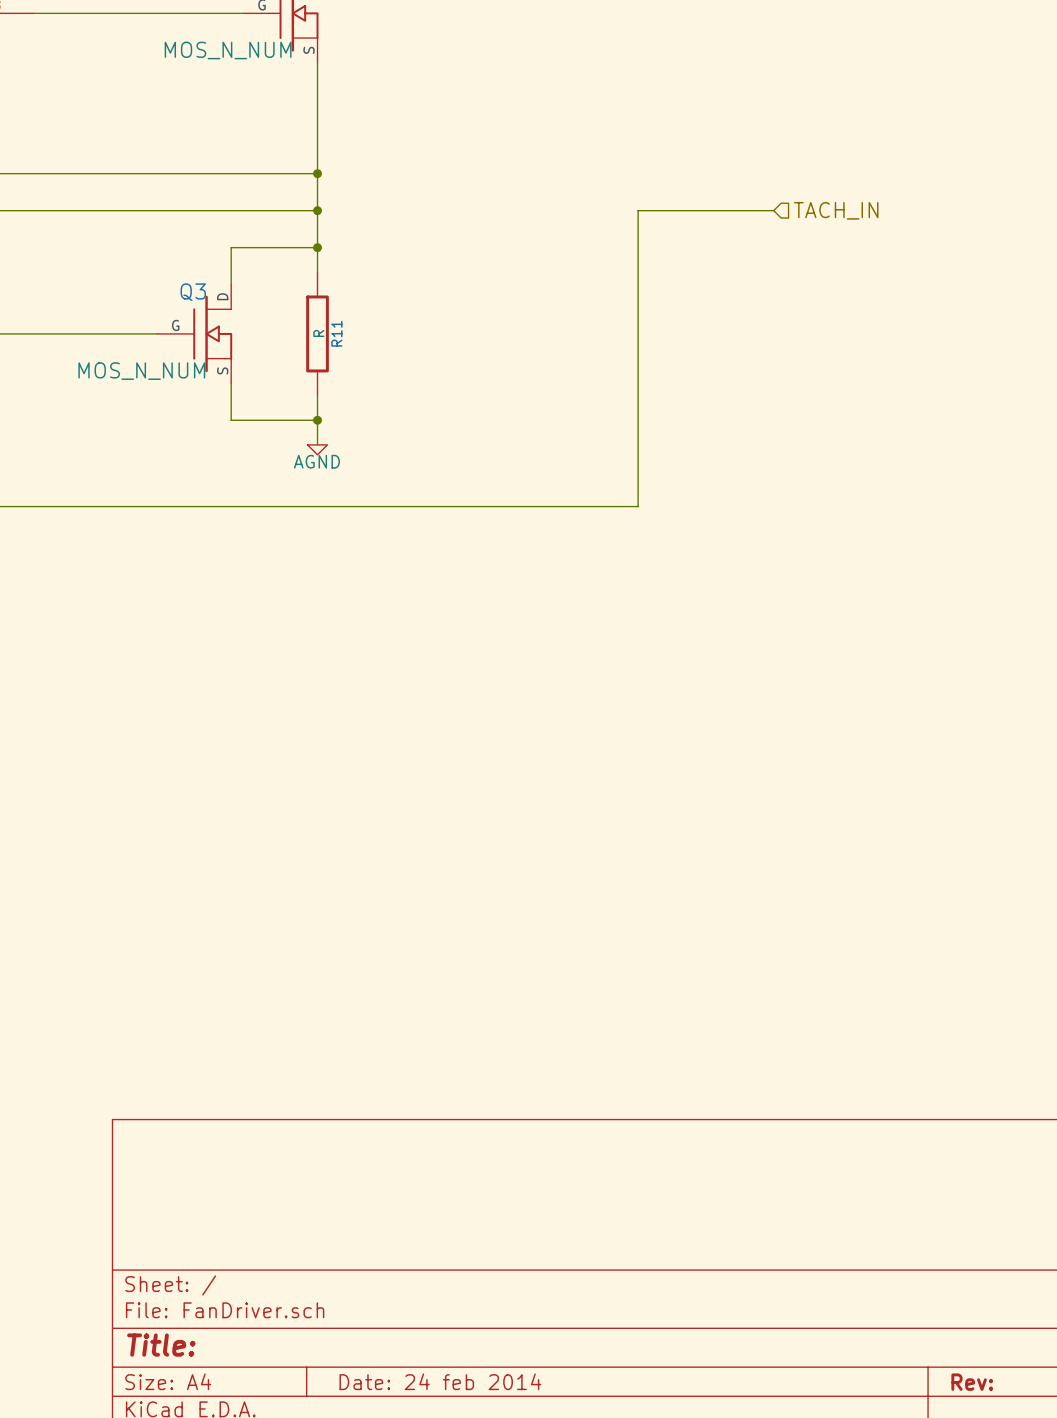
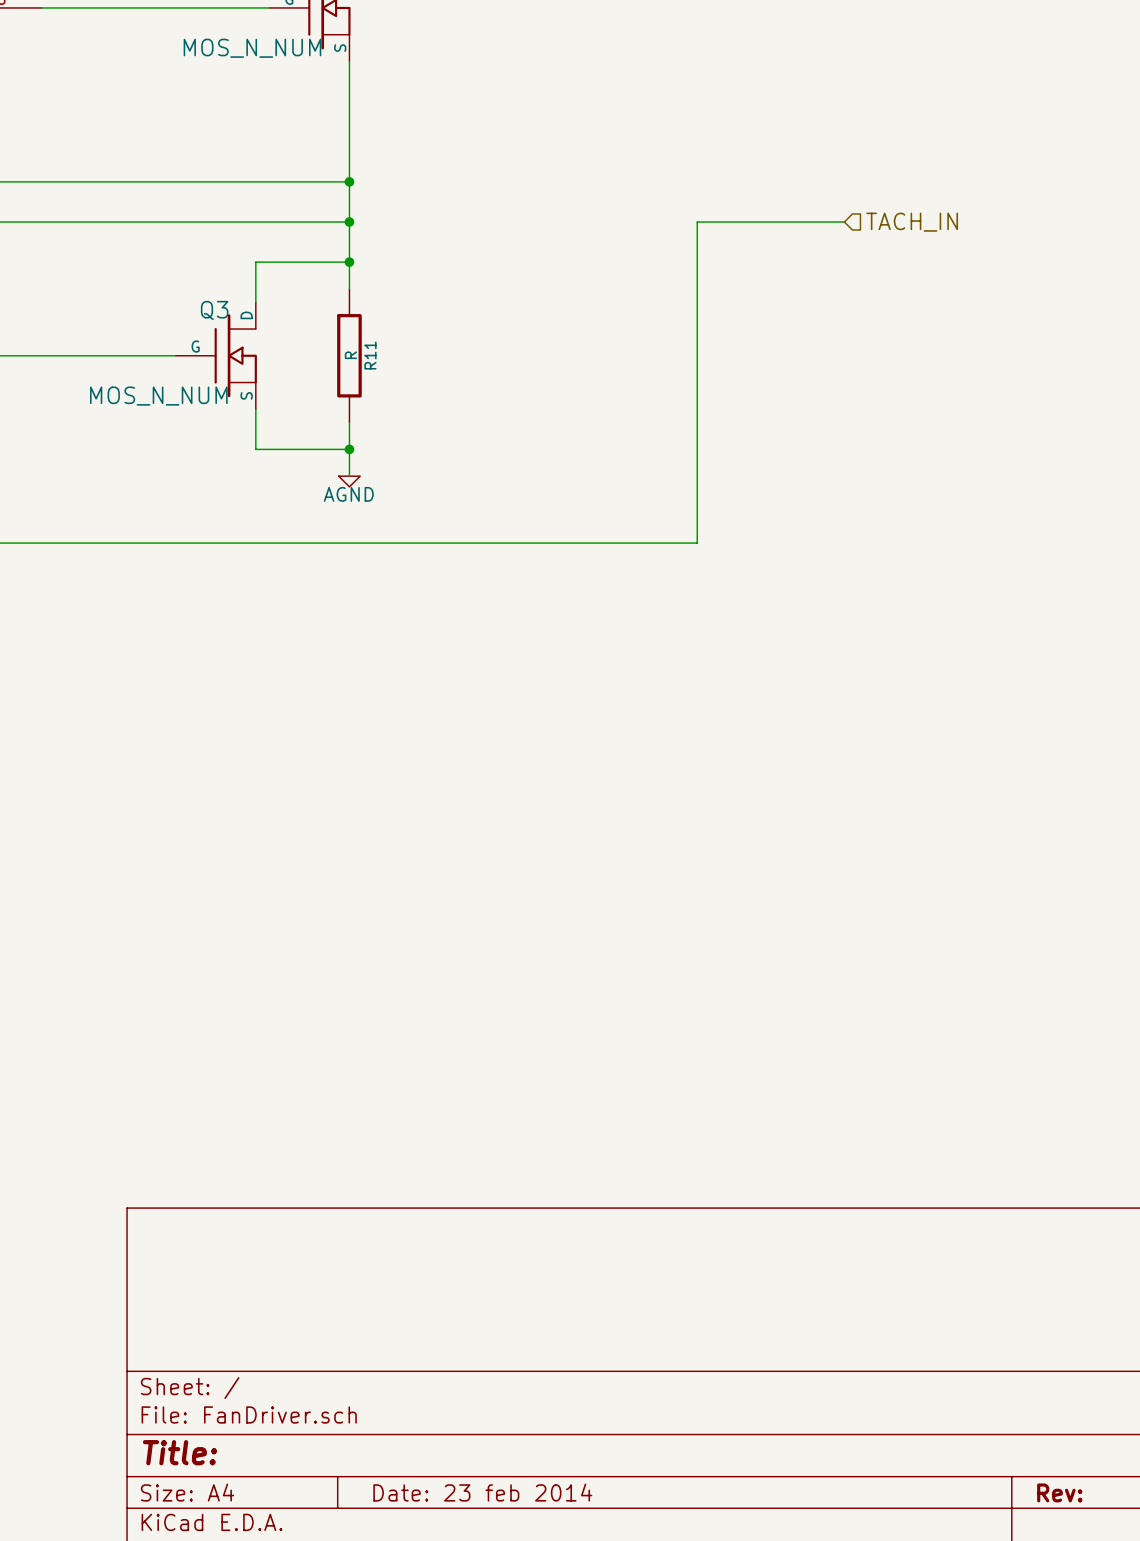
title block: Date: 24 feb 2014 (440, 1381) -> Date: 23 feb 2014 (482, 1492)

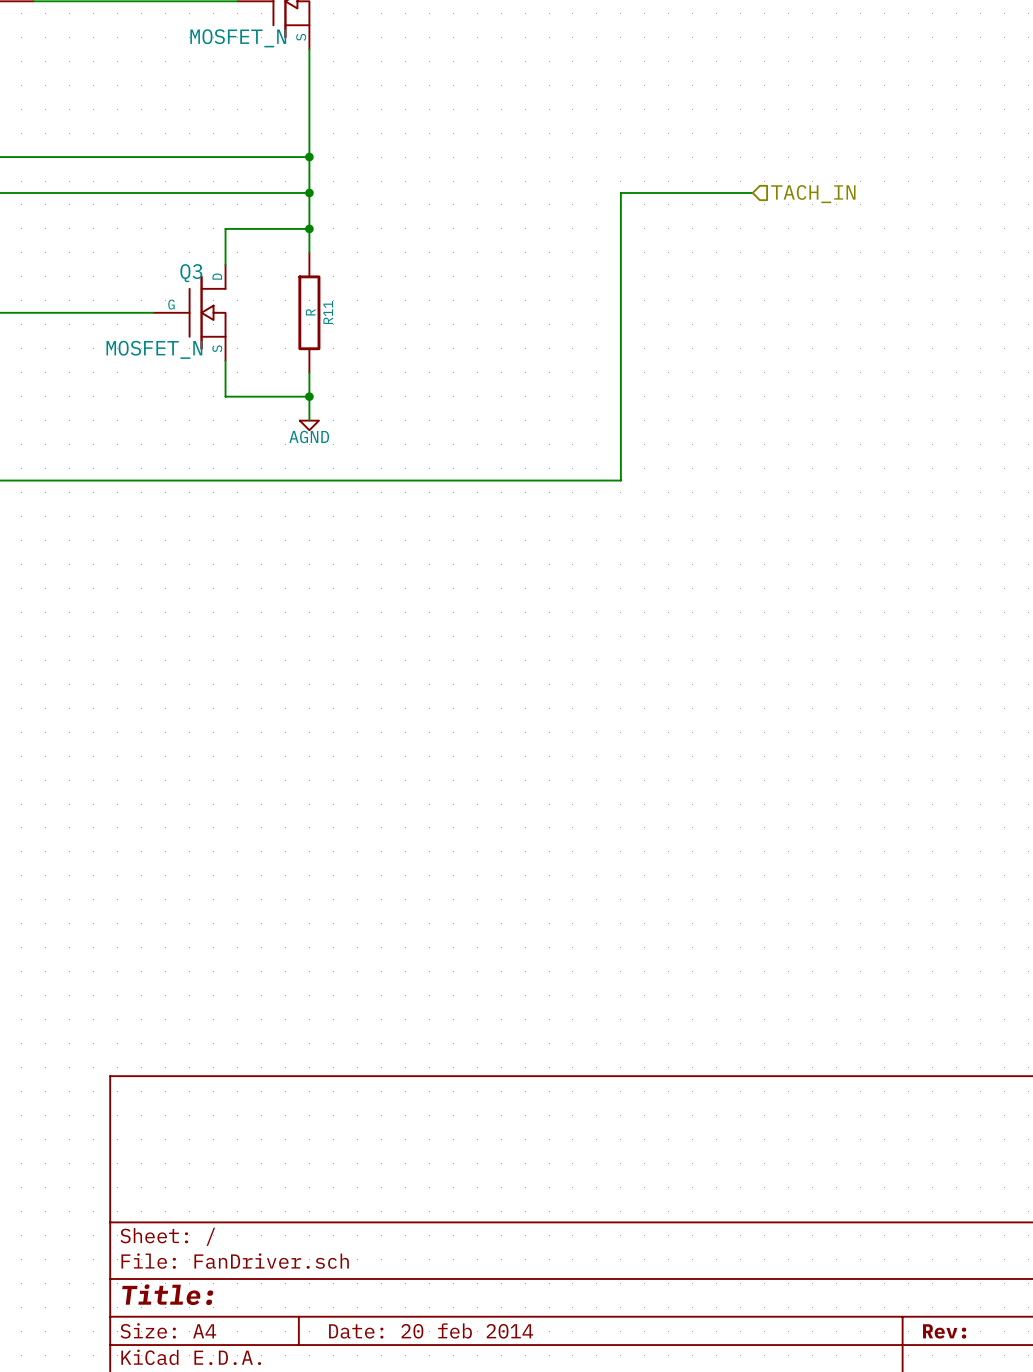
part value: MOS_N_NUM (252, 48) -> MOSFET_N (238, 38)
Q3 value: MOS_N_NUM (158, 396) -> MOSFET_N (154, 349)
title block: Date: 23 feb 2014 (482, 1492) -> Date: 20 feb 2014 (431, 1330)

